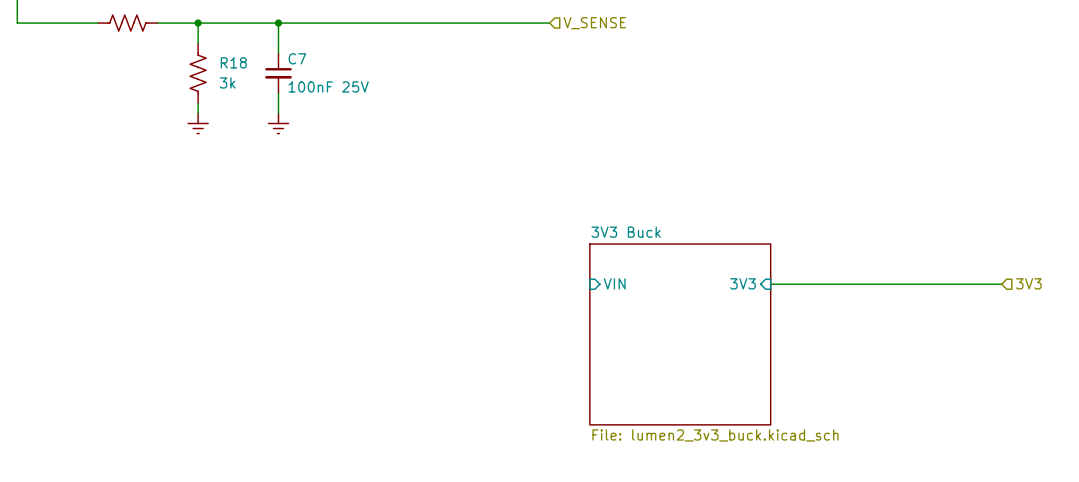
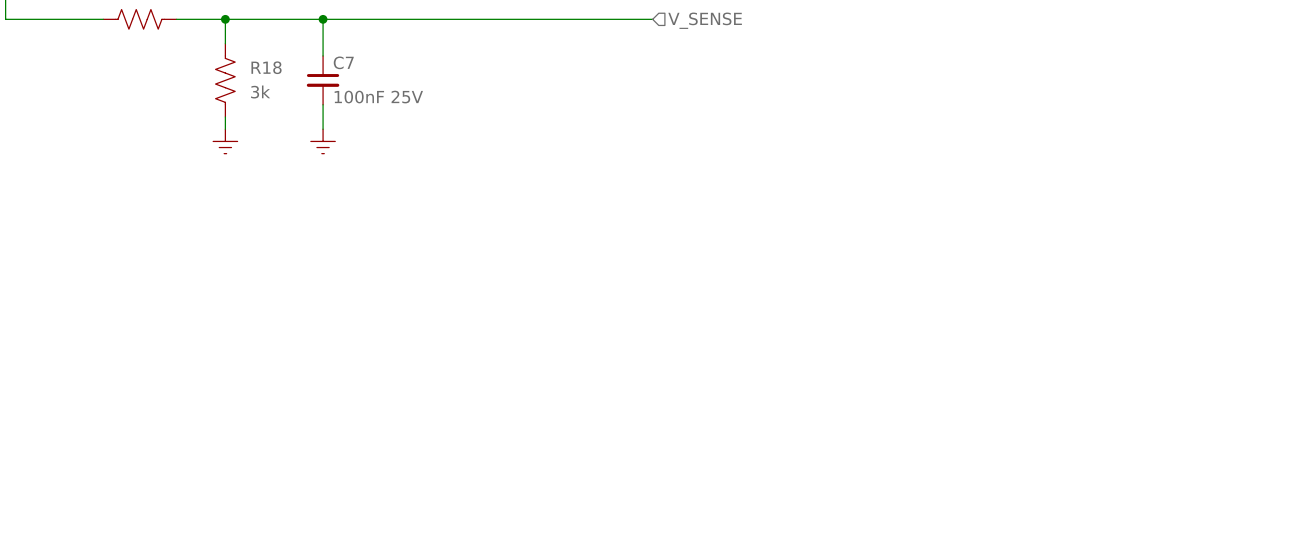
sheet pin: VIN (614, 283) -> none
sheet pin: 3V3 (743, 283) -> none
hierarchical label: 3V3 (1028, 283) -> none
wire: (770, 284) (1001, 284) -> none
sheet 3V3 Buck: File: lumen2_3v3_buck.kicad_sch (680, 334) -> none

